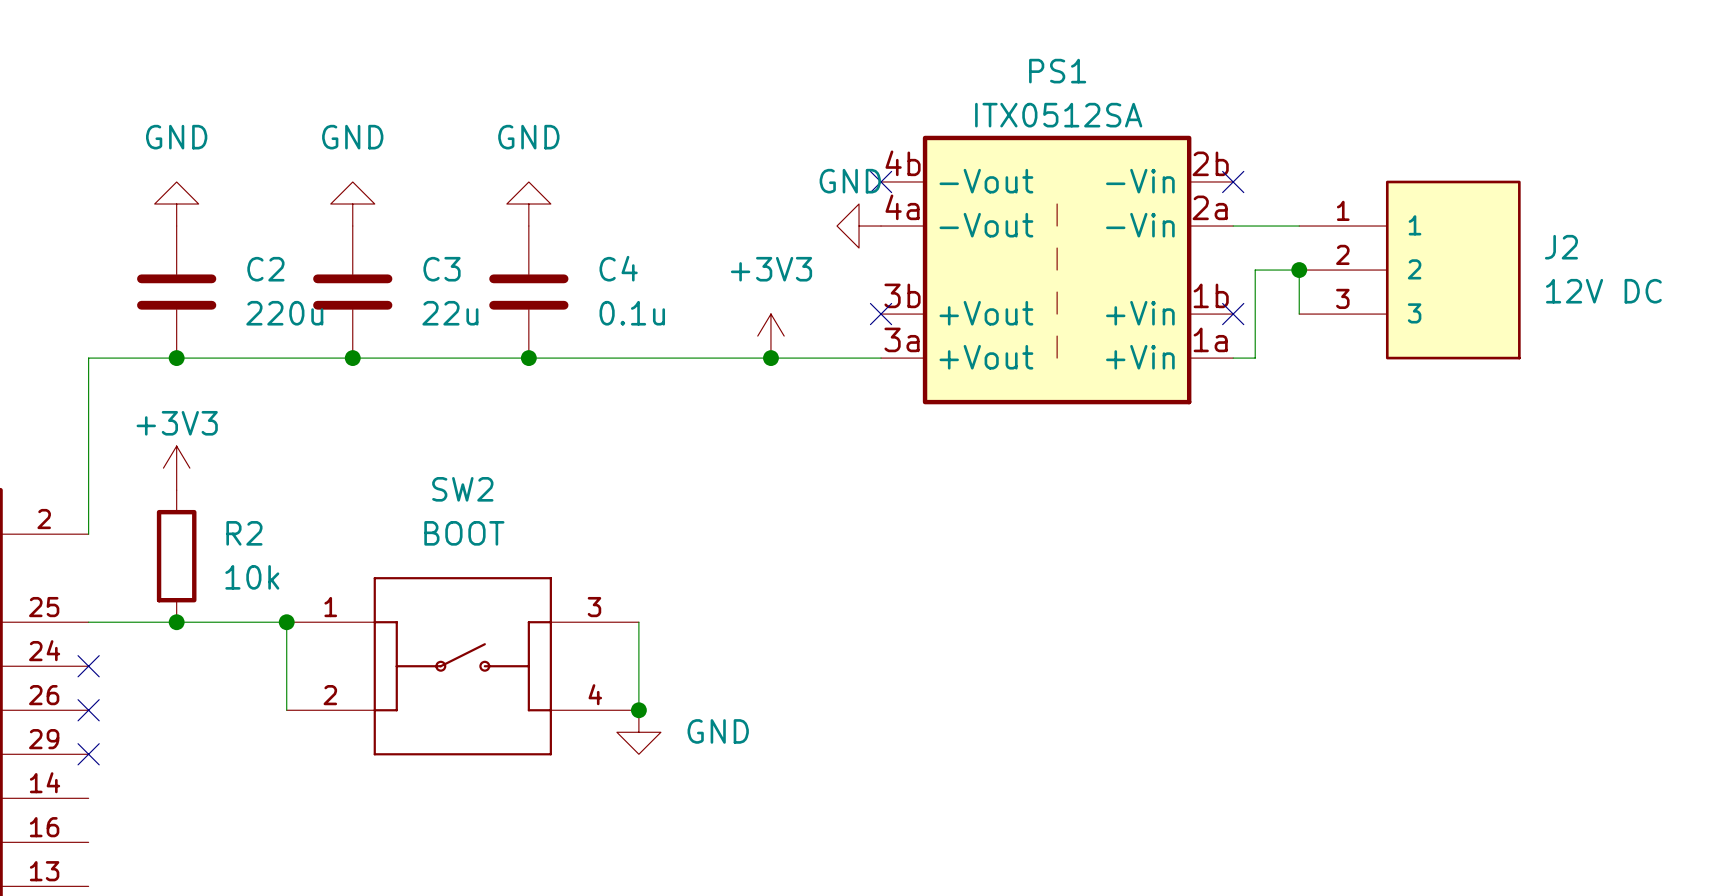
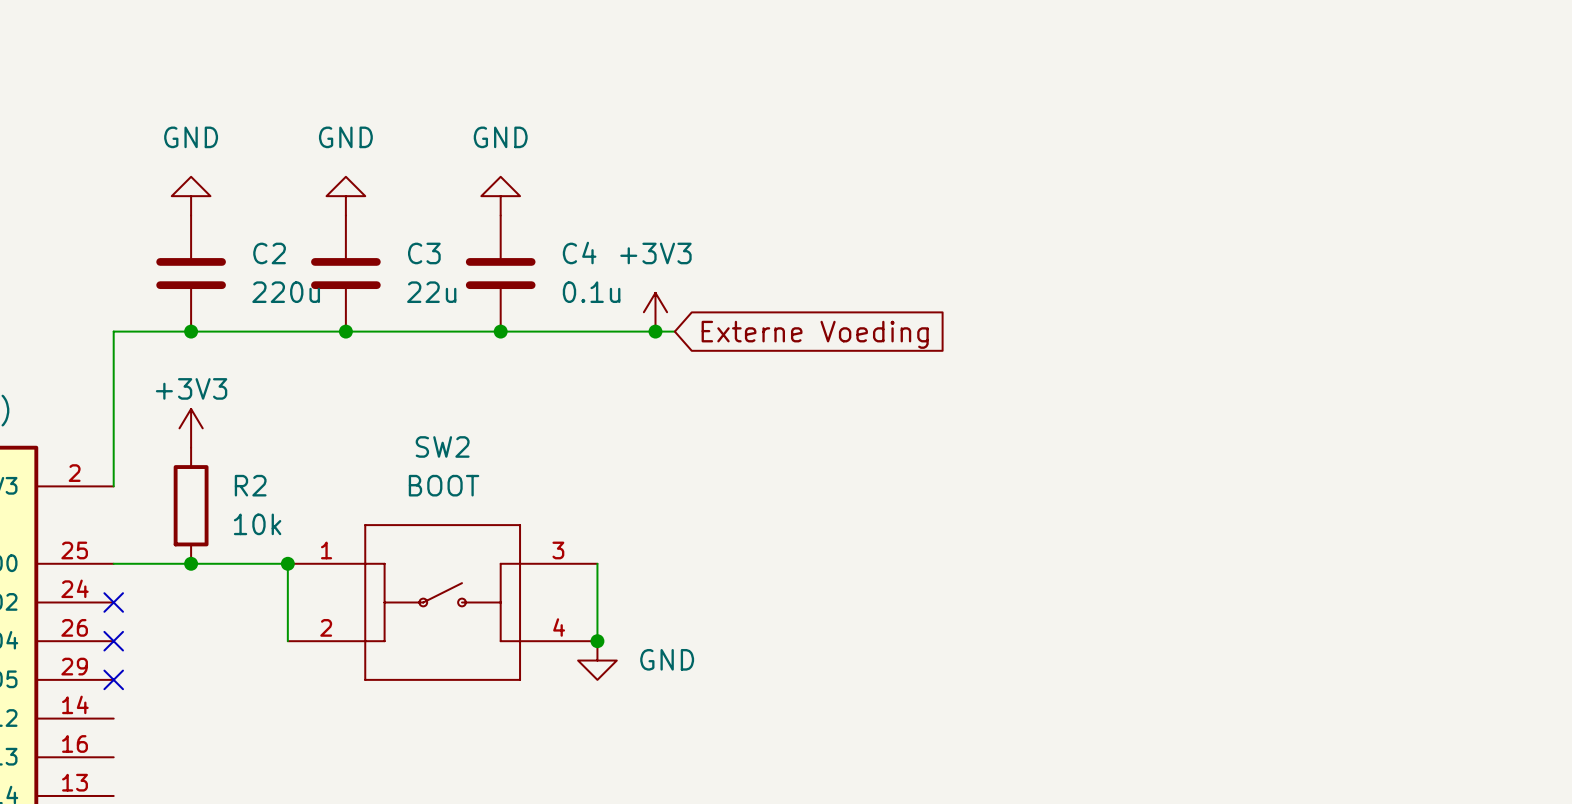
no-connect mark: (881, 181) -> none
no-connect mark: (1233, 181) -> none
power symbol: GND (859, 226) -> none
wire: (1233, 226) (1299, 226) -> none
PS1: ITX0512SA (1057, 270) -> none
junction: (1299, 270) -> none
J2: 12V DC (1409, 270) -> none
no-connect mark: (881, 314) -> none
no-connect mark: (1233, 314) -> none
wire: (1299, 314) (1299, 270) (1255, 270) (1255, 358) (1233, 358) -> none
power symbol position: +3V3 (770, 336) -> +3V3 (655, 312)
wire: (726, 358) (881, 358) -> none
junction position: (770, 358) -> (655, 331)
global label: none -> Externe Voeding (815, 334)

